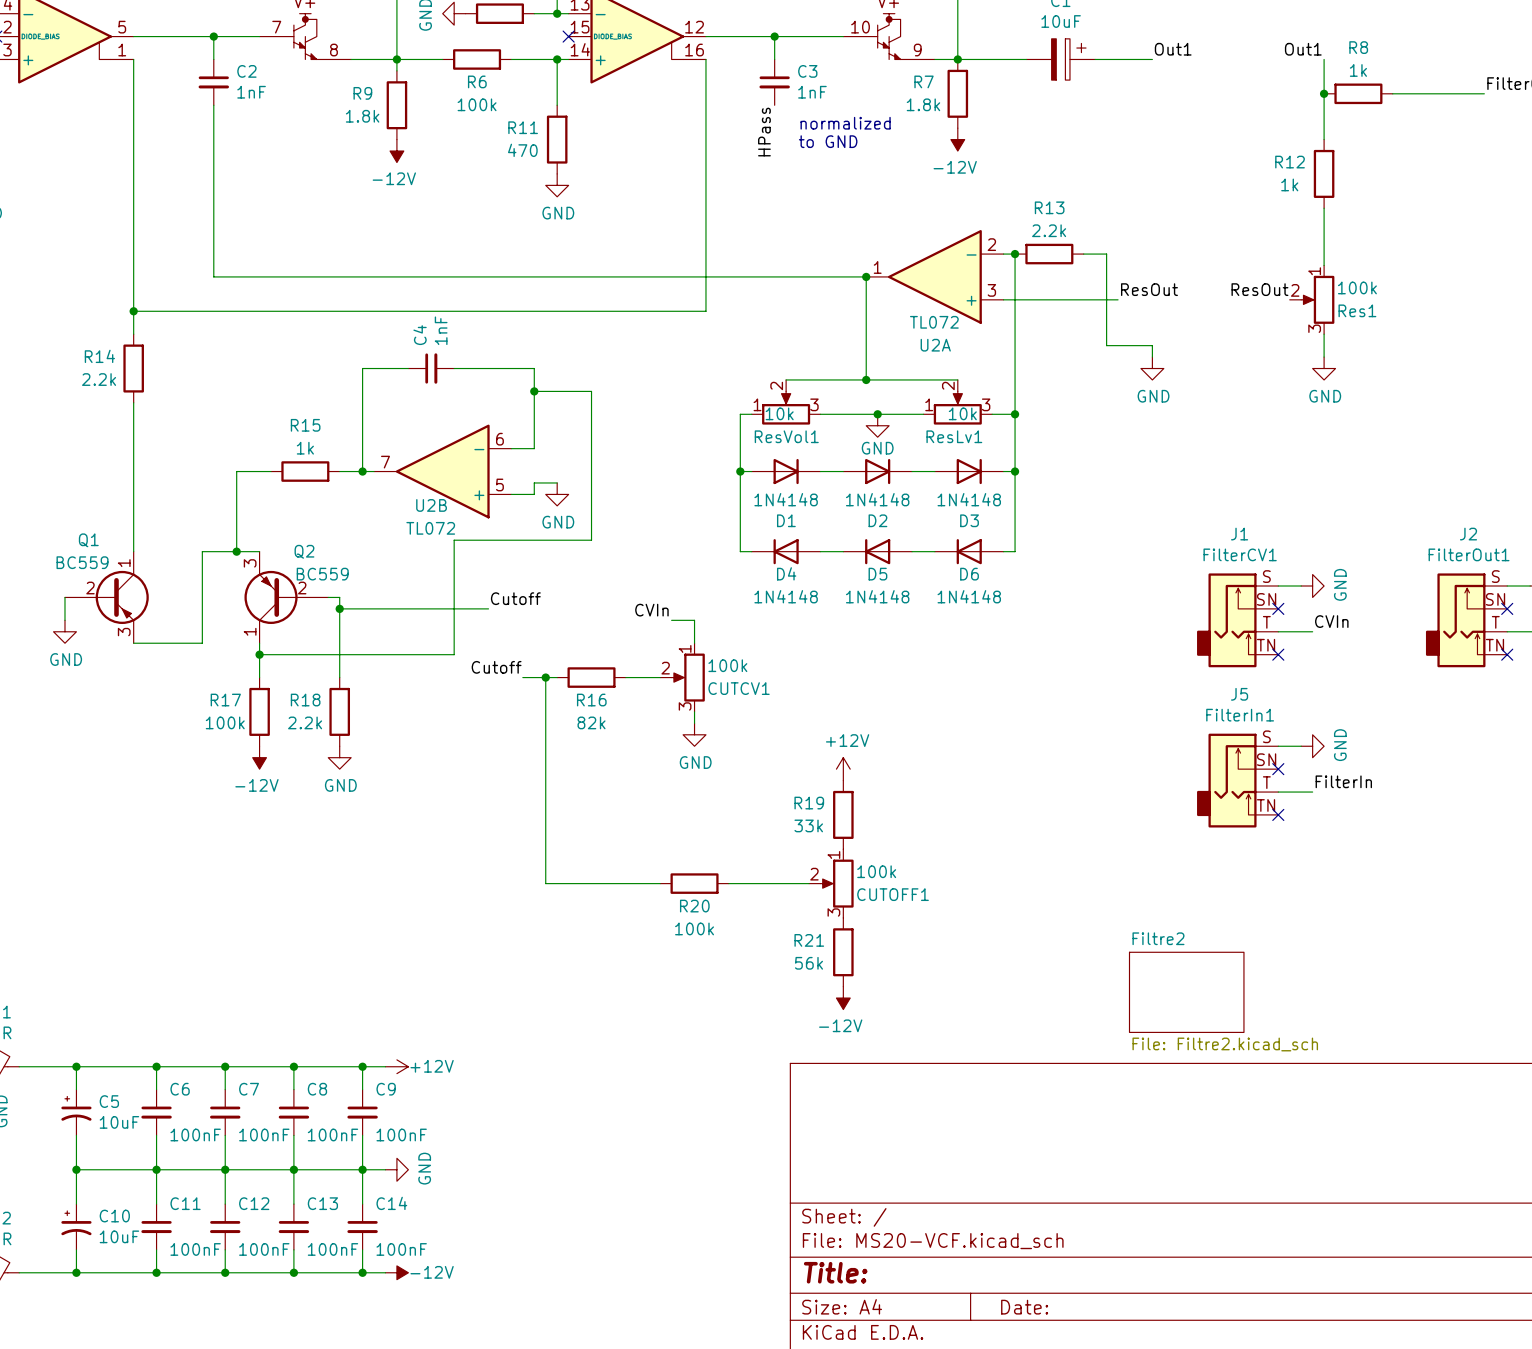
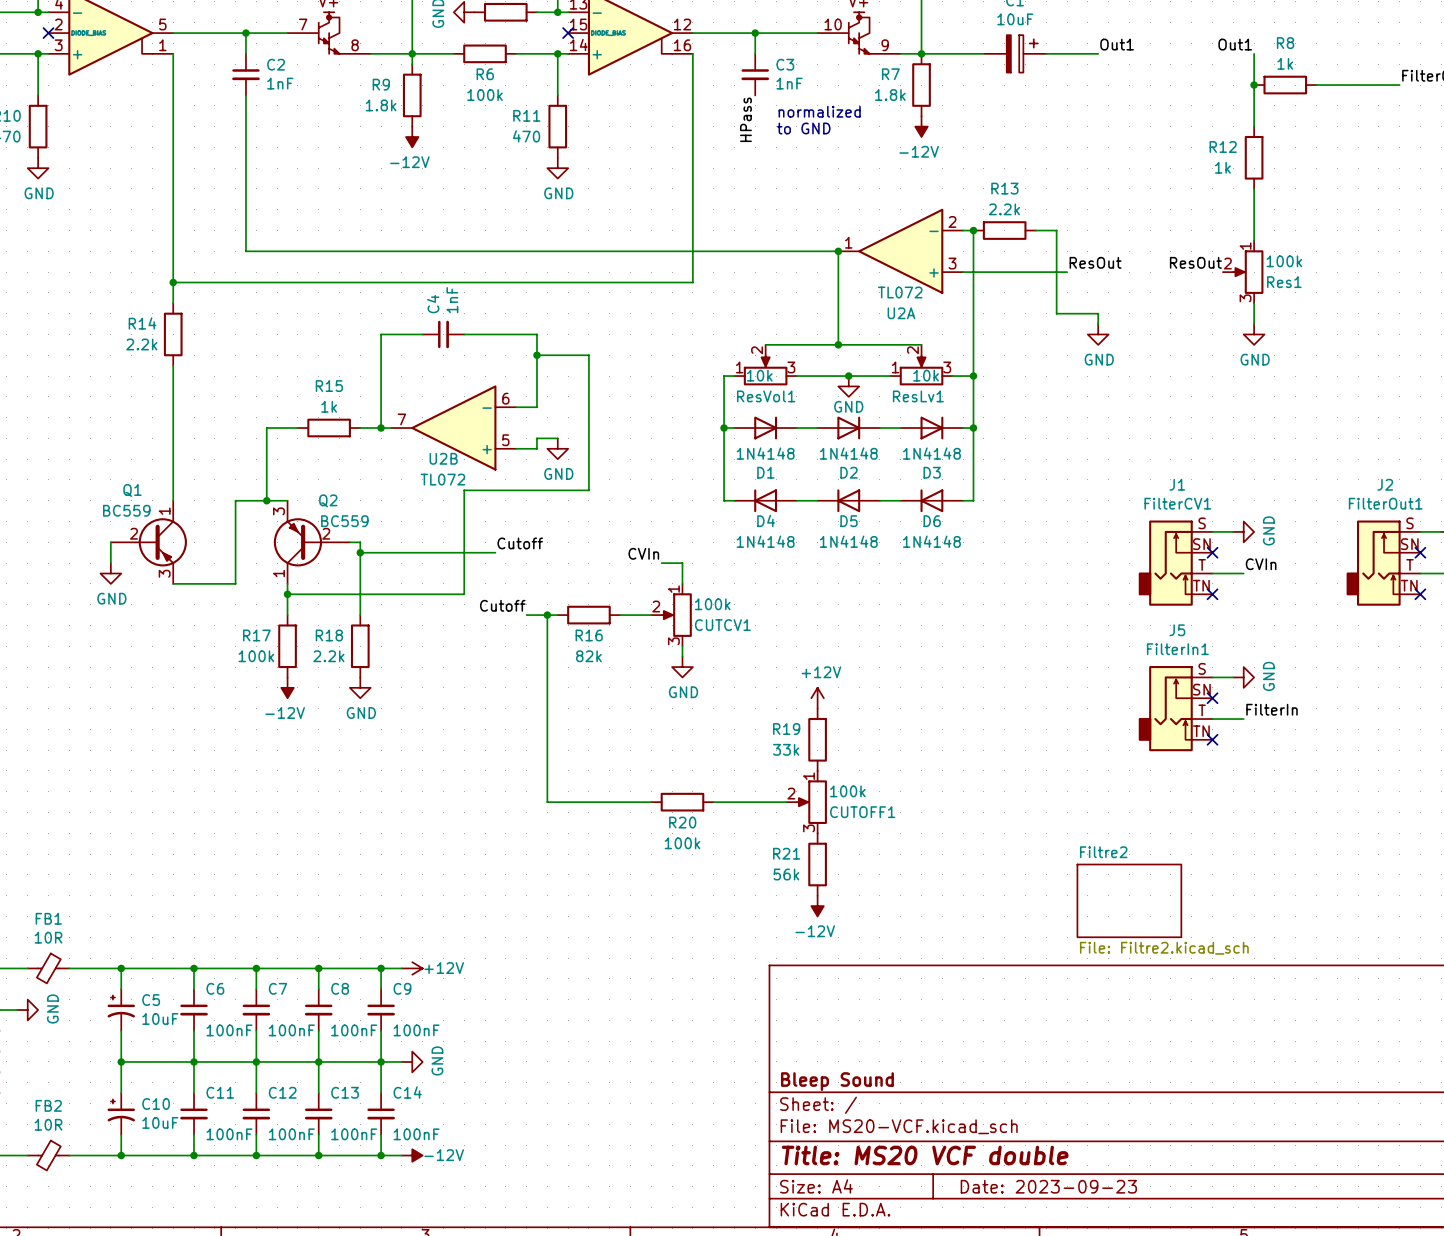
title block: none -> Bleep Sound (837, 1081)
title block: Title: (835, 1272) -> Title: MS20 VCF double (925, 1155)
title block: Date: (1024, 1307) -> Date: 2023-09-23 (1048, 1186)

